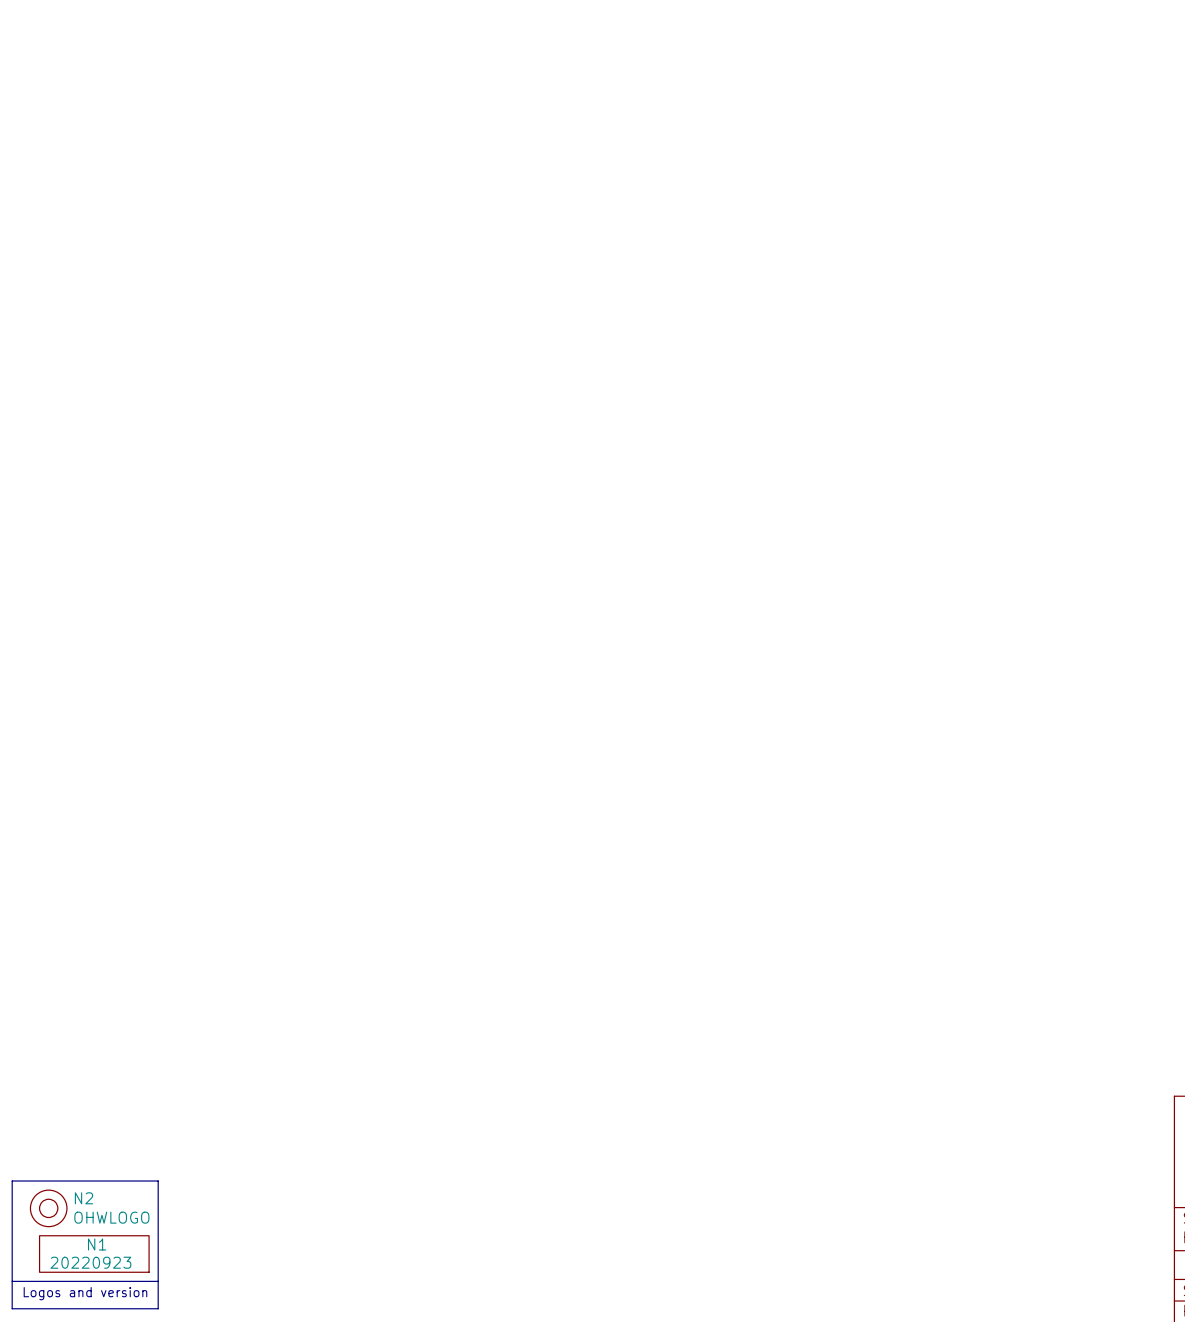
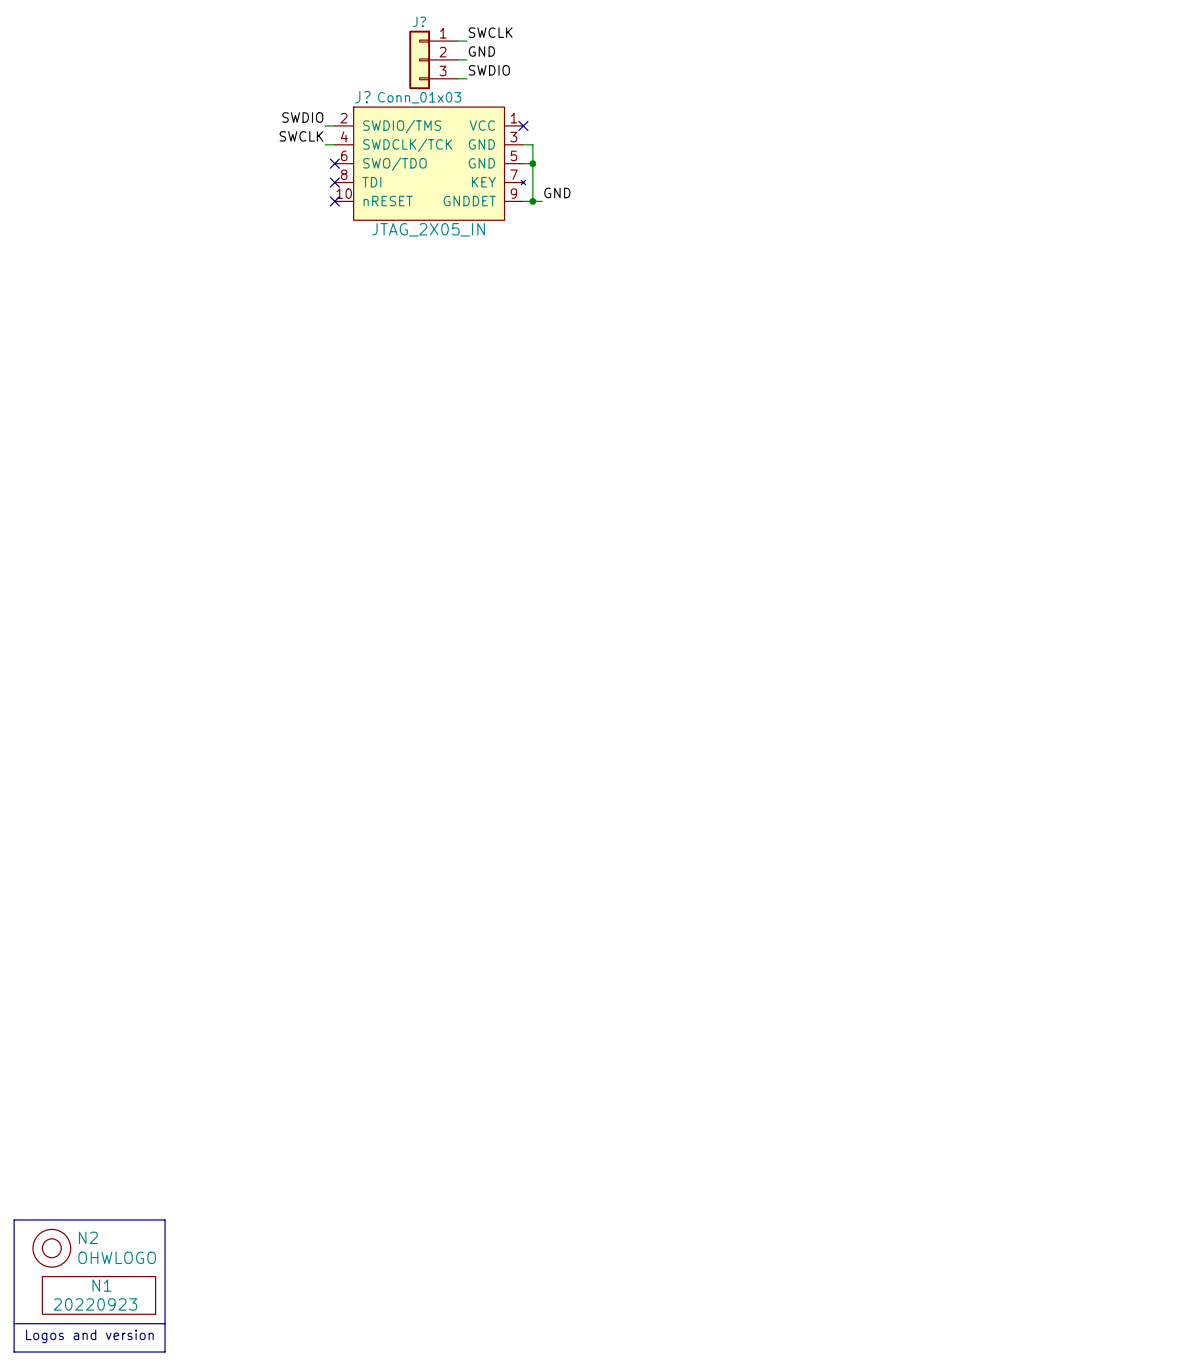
label: none -> SWCLK (490, 32)
wire: none -> (457, 41) (466, 41)
label: none -> GND (481, 51)
J?: none -> Conn_01x03 (433, 59)
wire: none -> (457, 59) (466, 59)
label: none -> SWDIO (489, 70)
wire: none -> (457, 78) (466, 78)
label: none -> SWDIO (302, 117)
wire: none -> (325, 125) (334, 125)
no-connect mark: none -> (523, 125)
label: none -> SWCLK (301, 136)
wire: none -> (325, 144) (334, 144)
wire: none -> (523, 144) (532, 144) (532, 201)
no-connect mark: none -> (334, 163)
J?: none -> JTAG_2X05_IN (430, 163)
wire: none -> (523, 163) (532, 163)
junction: none -> (532, 163)
no-connect mark: none -> (334, 182)
label: none -> GND (557, 192)
no-connect mark: none -> (334, 201)
wire: none -> (523, 201) (542, 201)
junction: none -> (532, 201)

